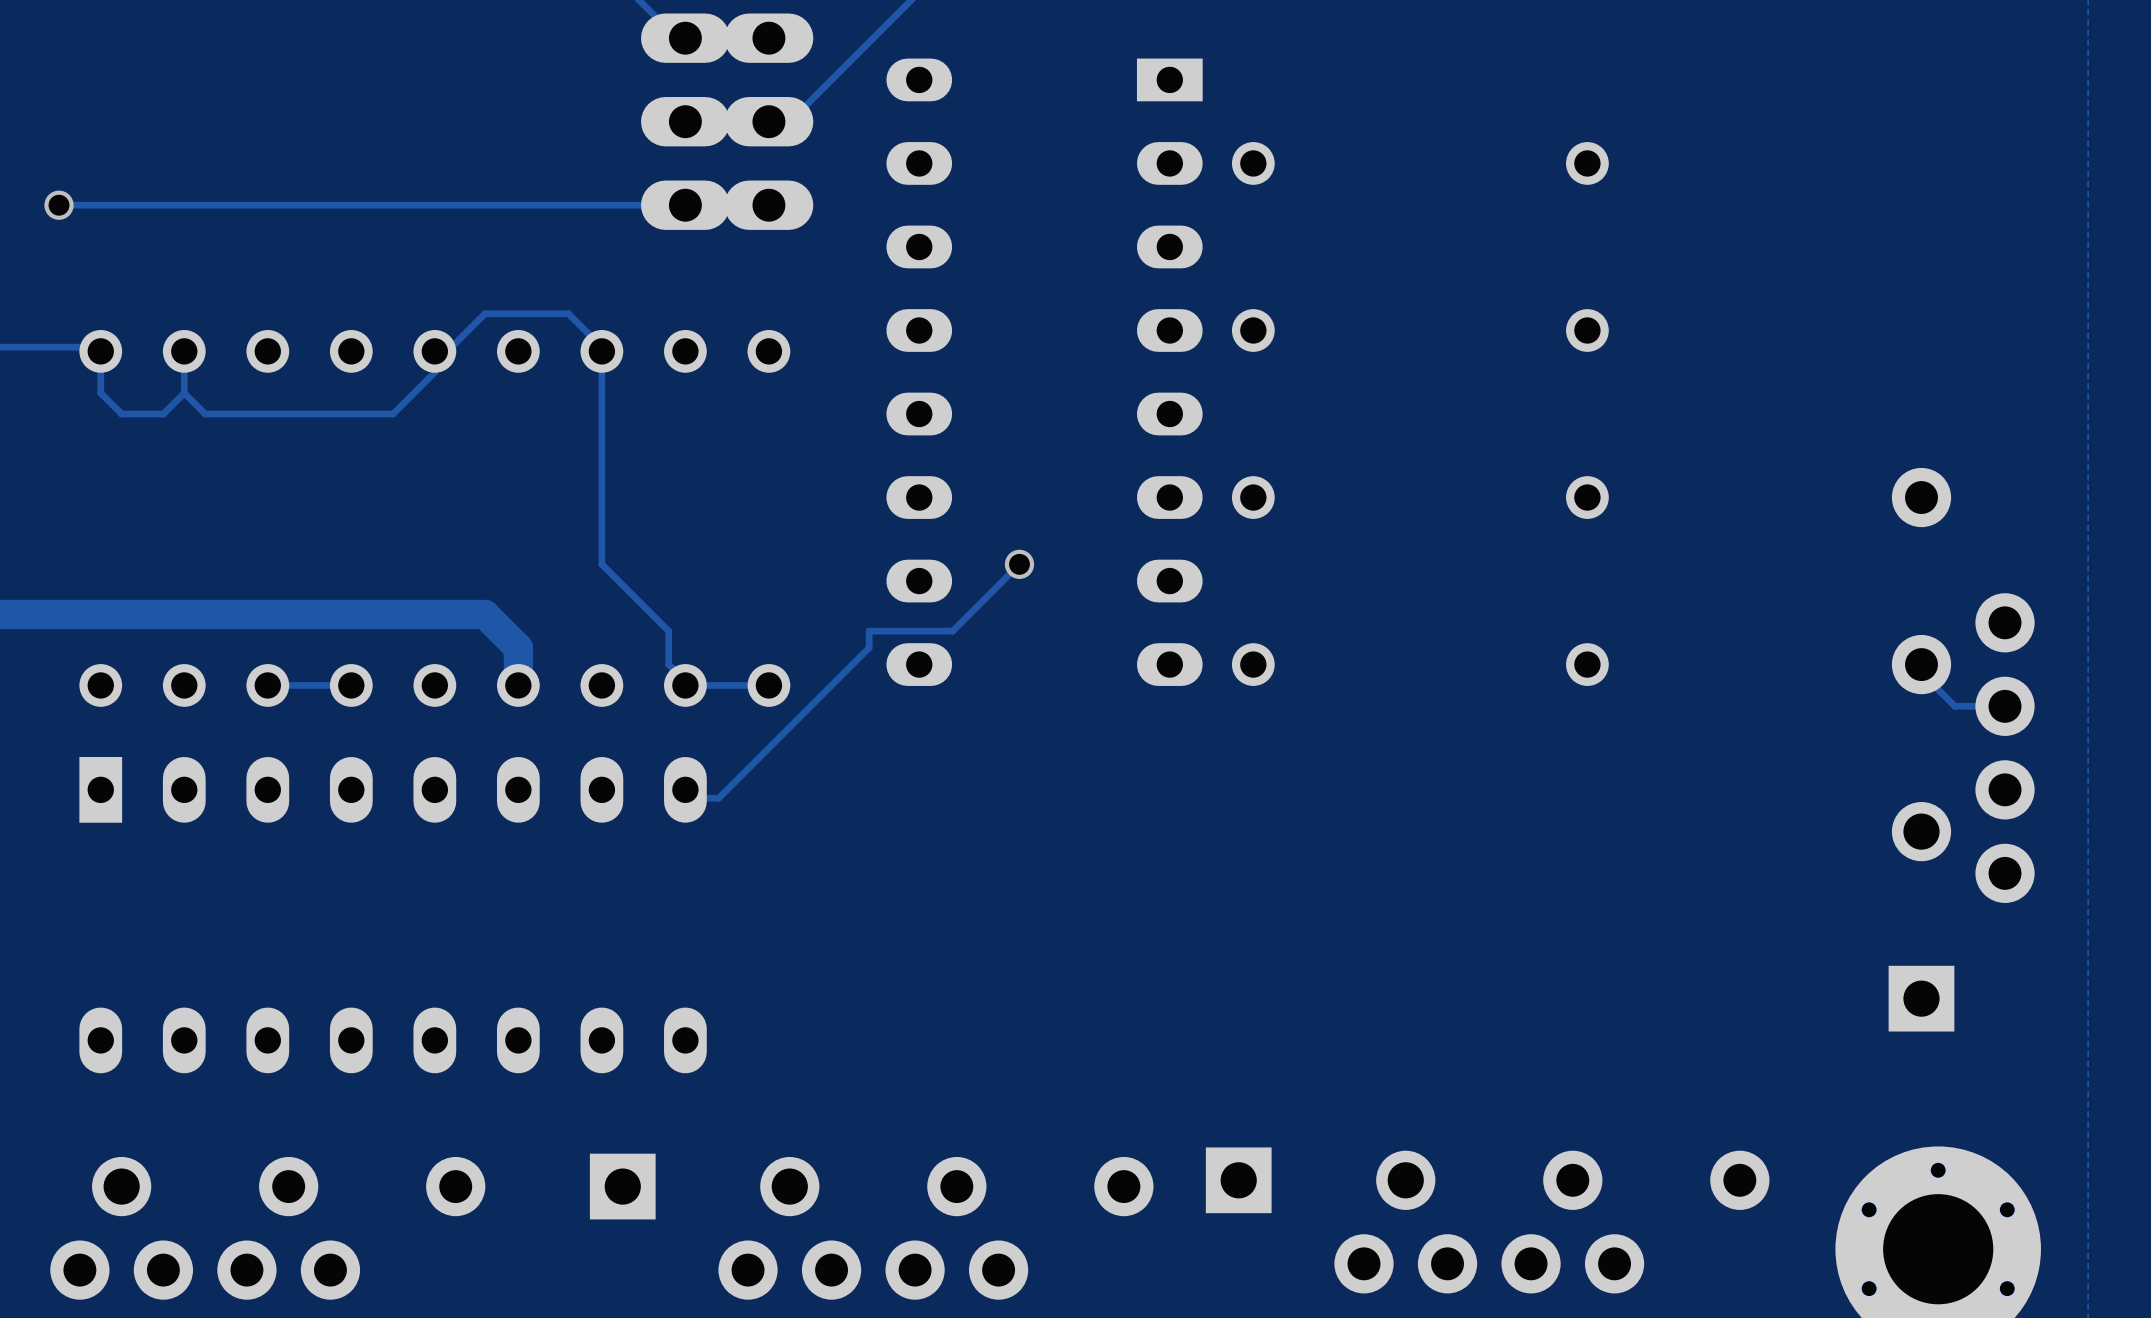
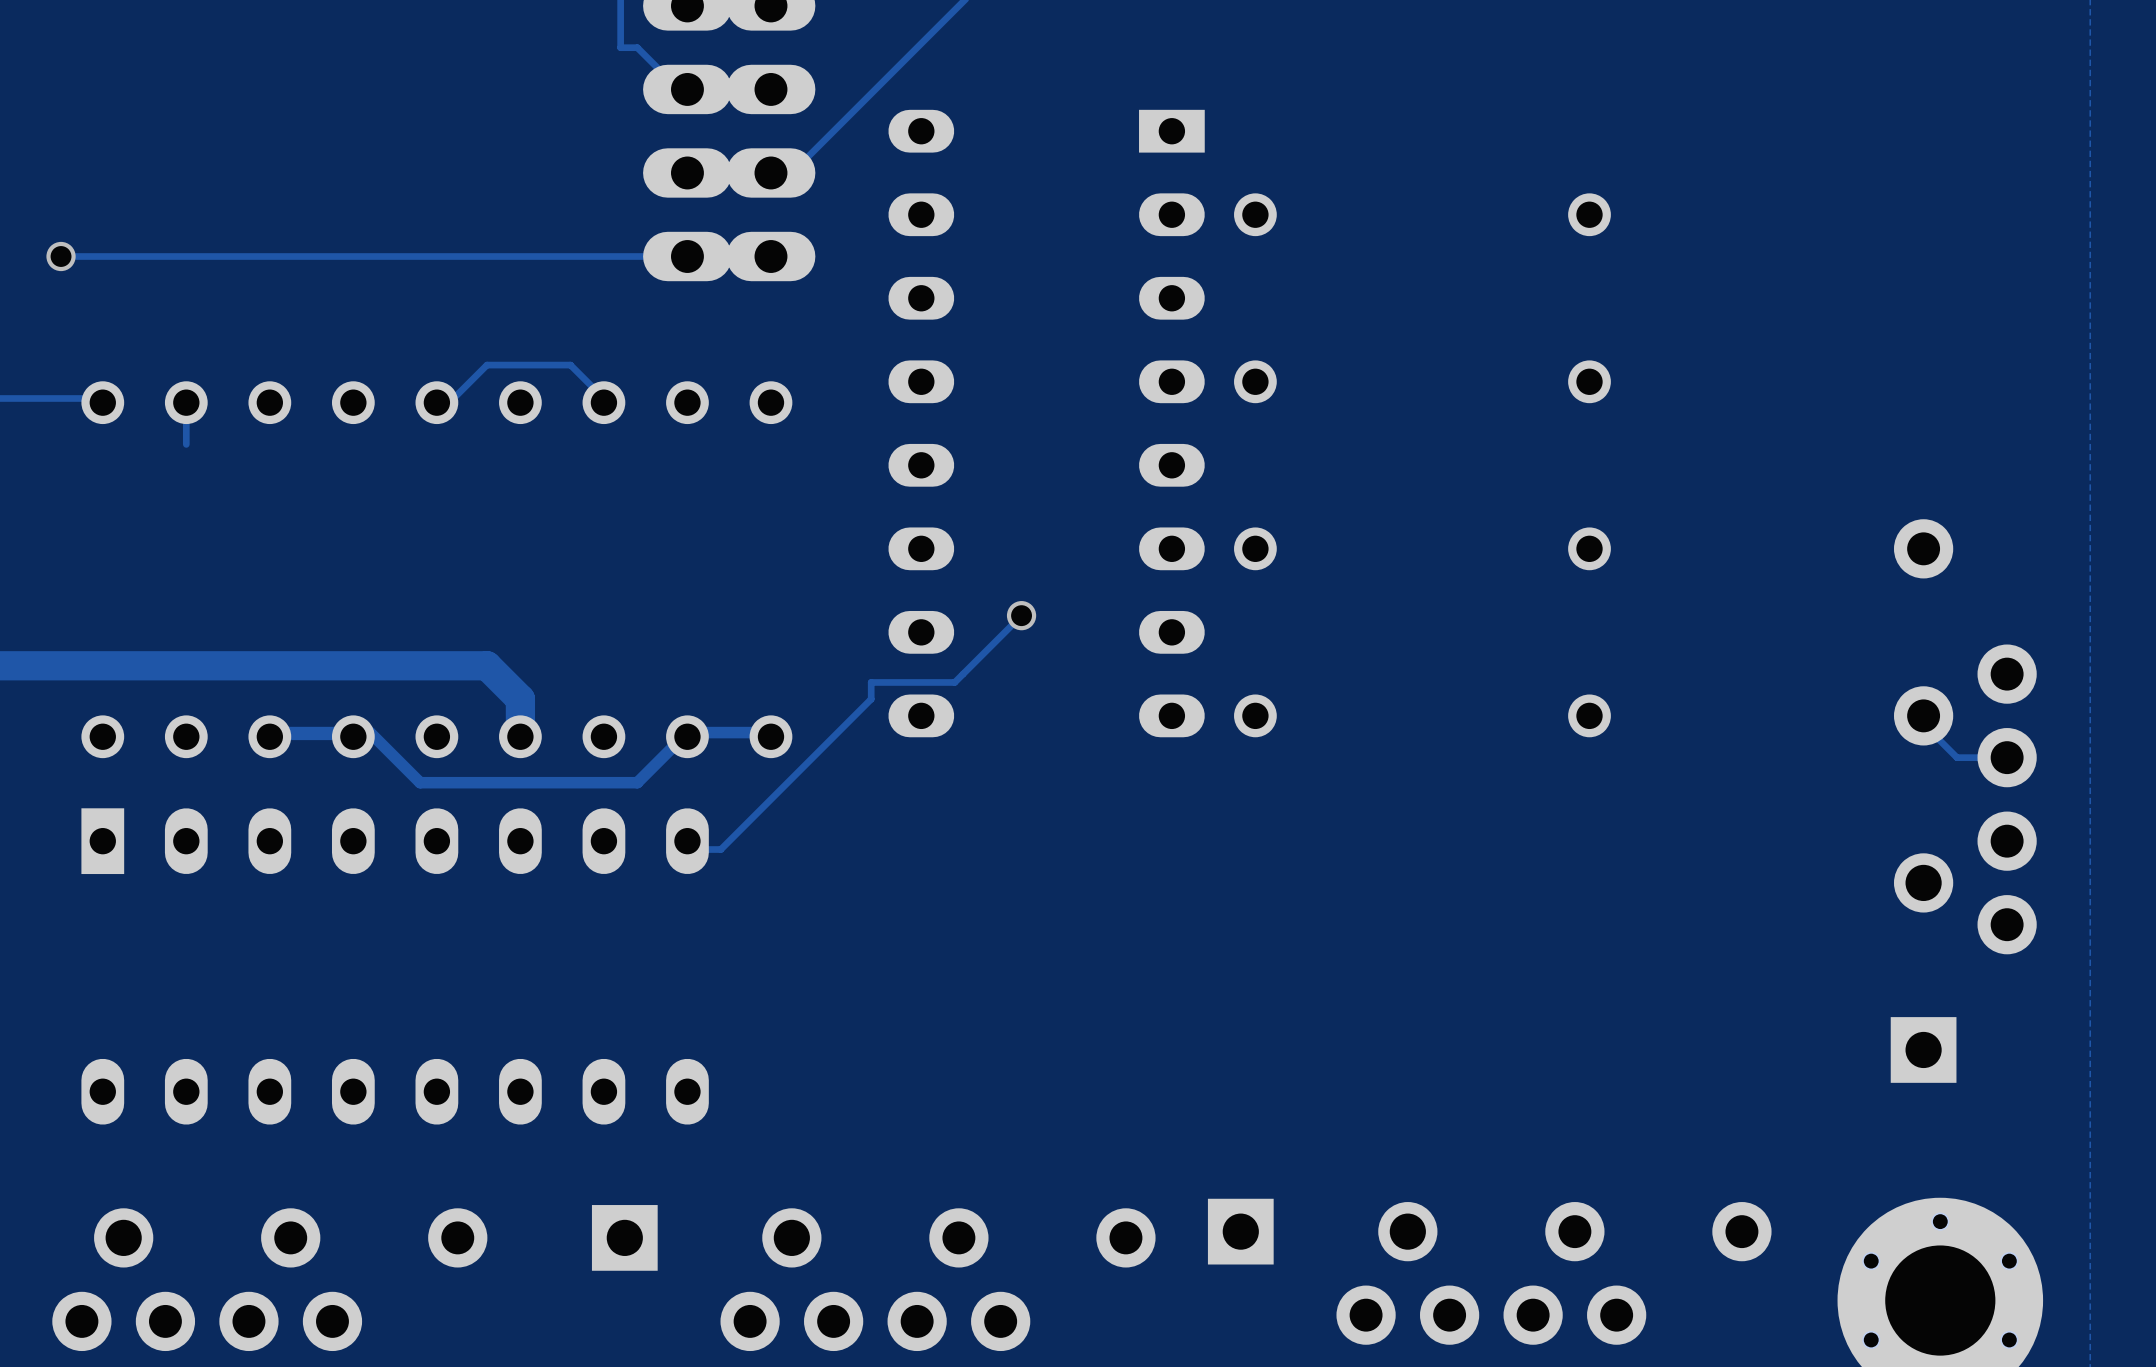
track: (434, 351) (434, 372) (393, 414) (205, 414) (184, 393) (163, 414) (121, 414) (100, 393) (100, 351) -> none
track: (601, 351) (601, 564) (668, 631) (668, 664) (685, 681) -> none
track: (768, 685) (685, 685) -> (770, 736) (770, 732) (687, 732) (637, 782) (420, 782) (370, 732) (269, 732) (269, 736)

